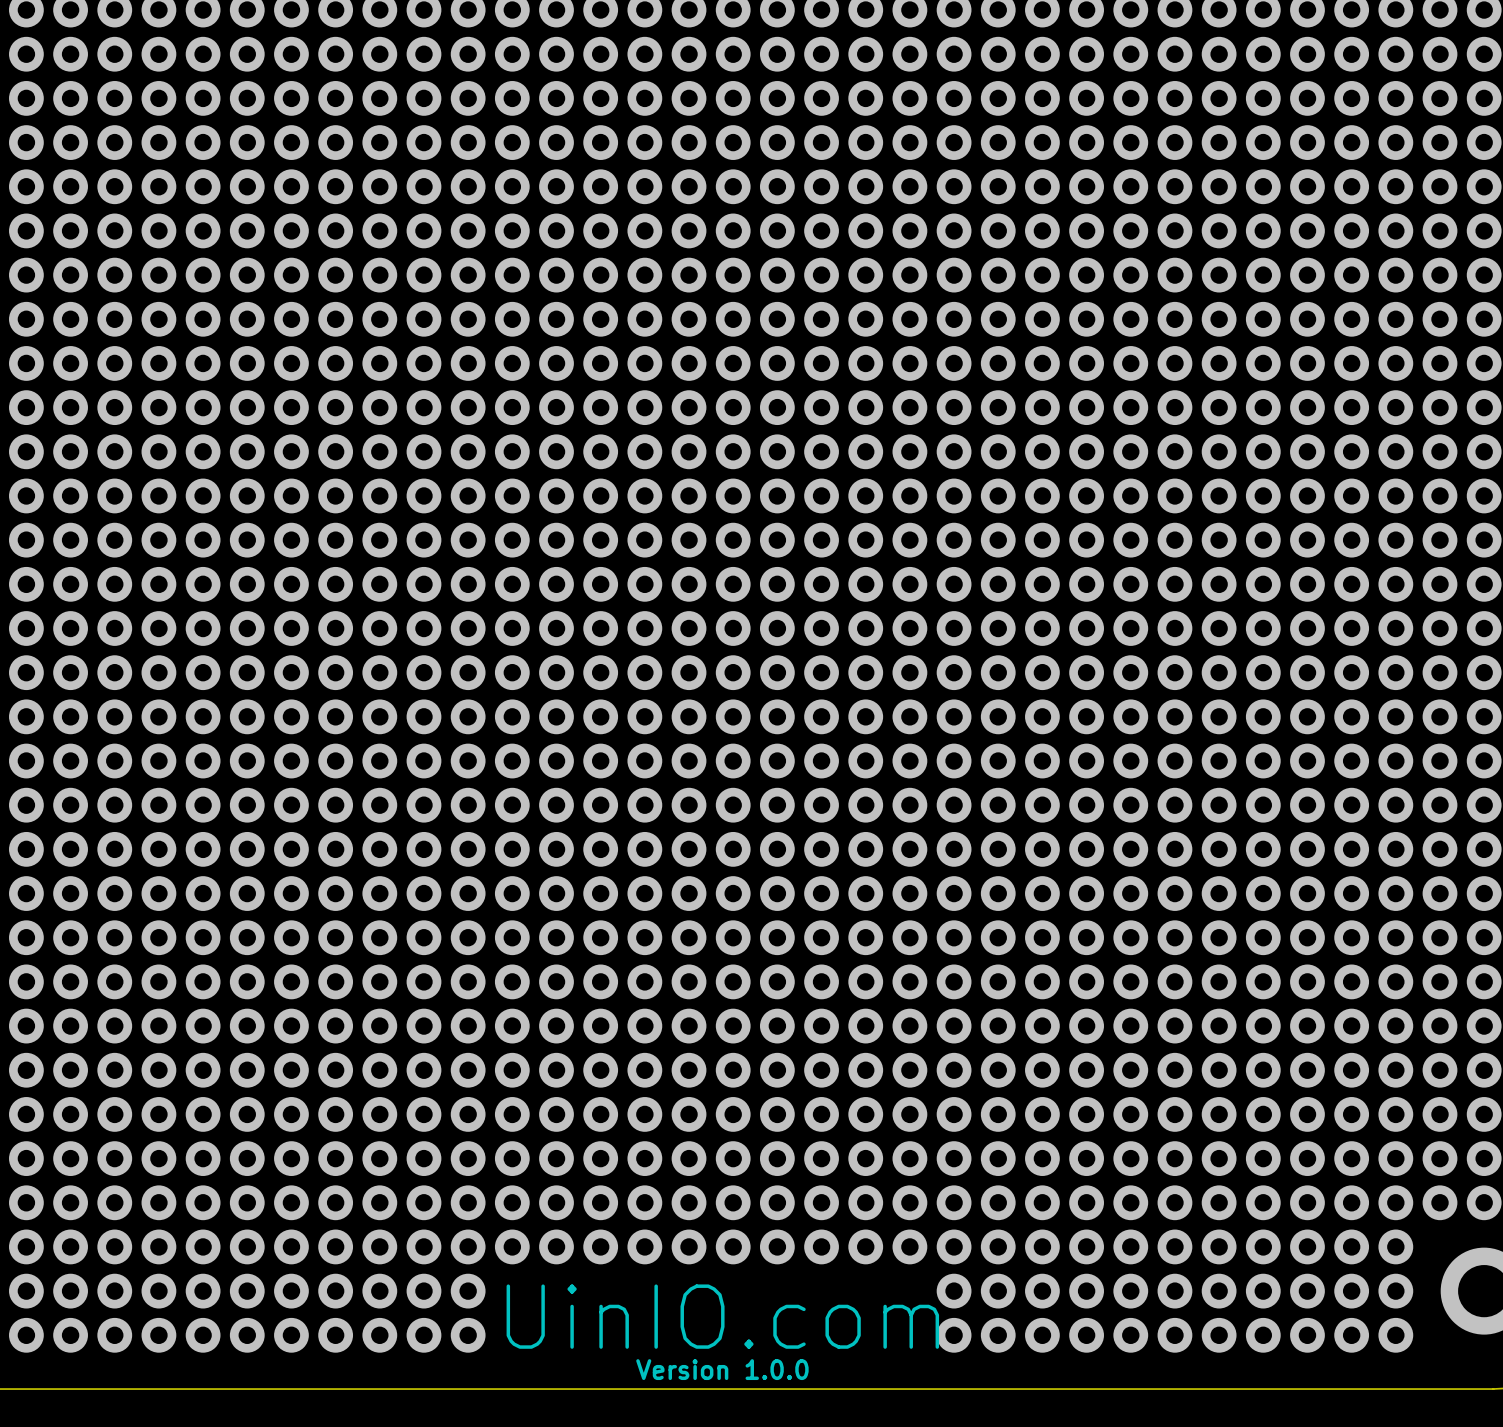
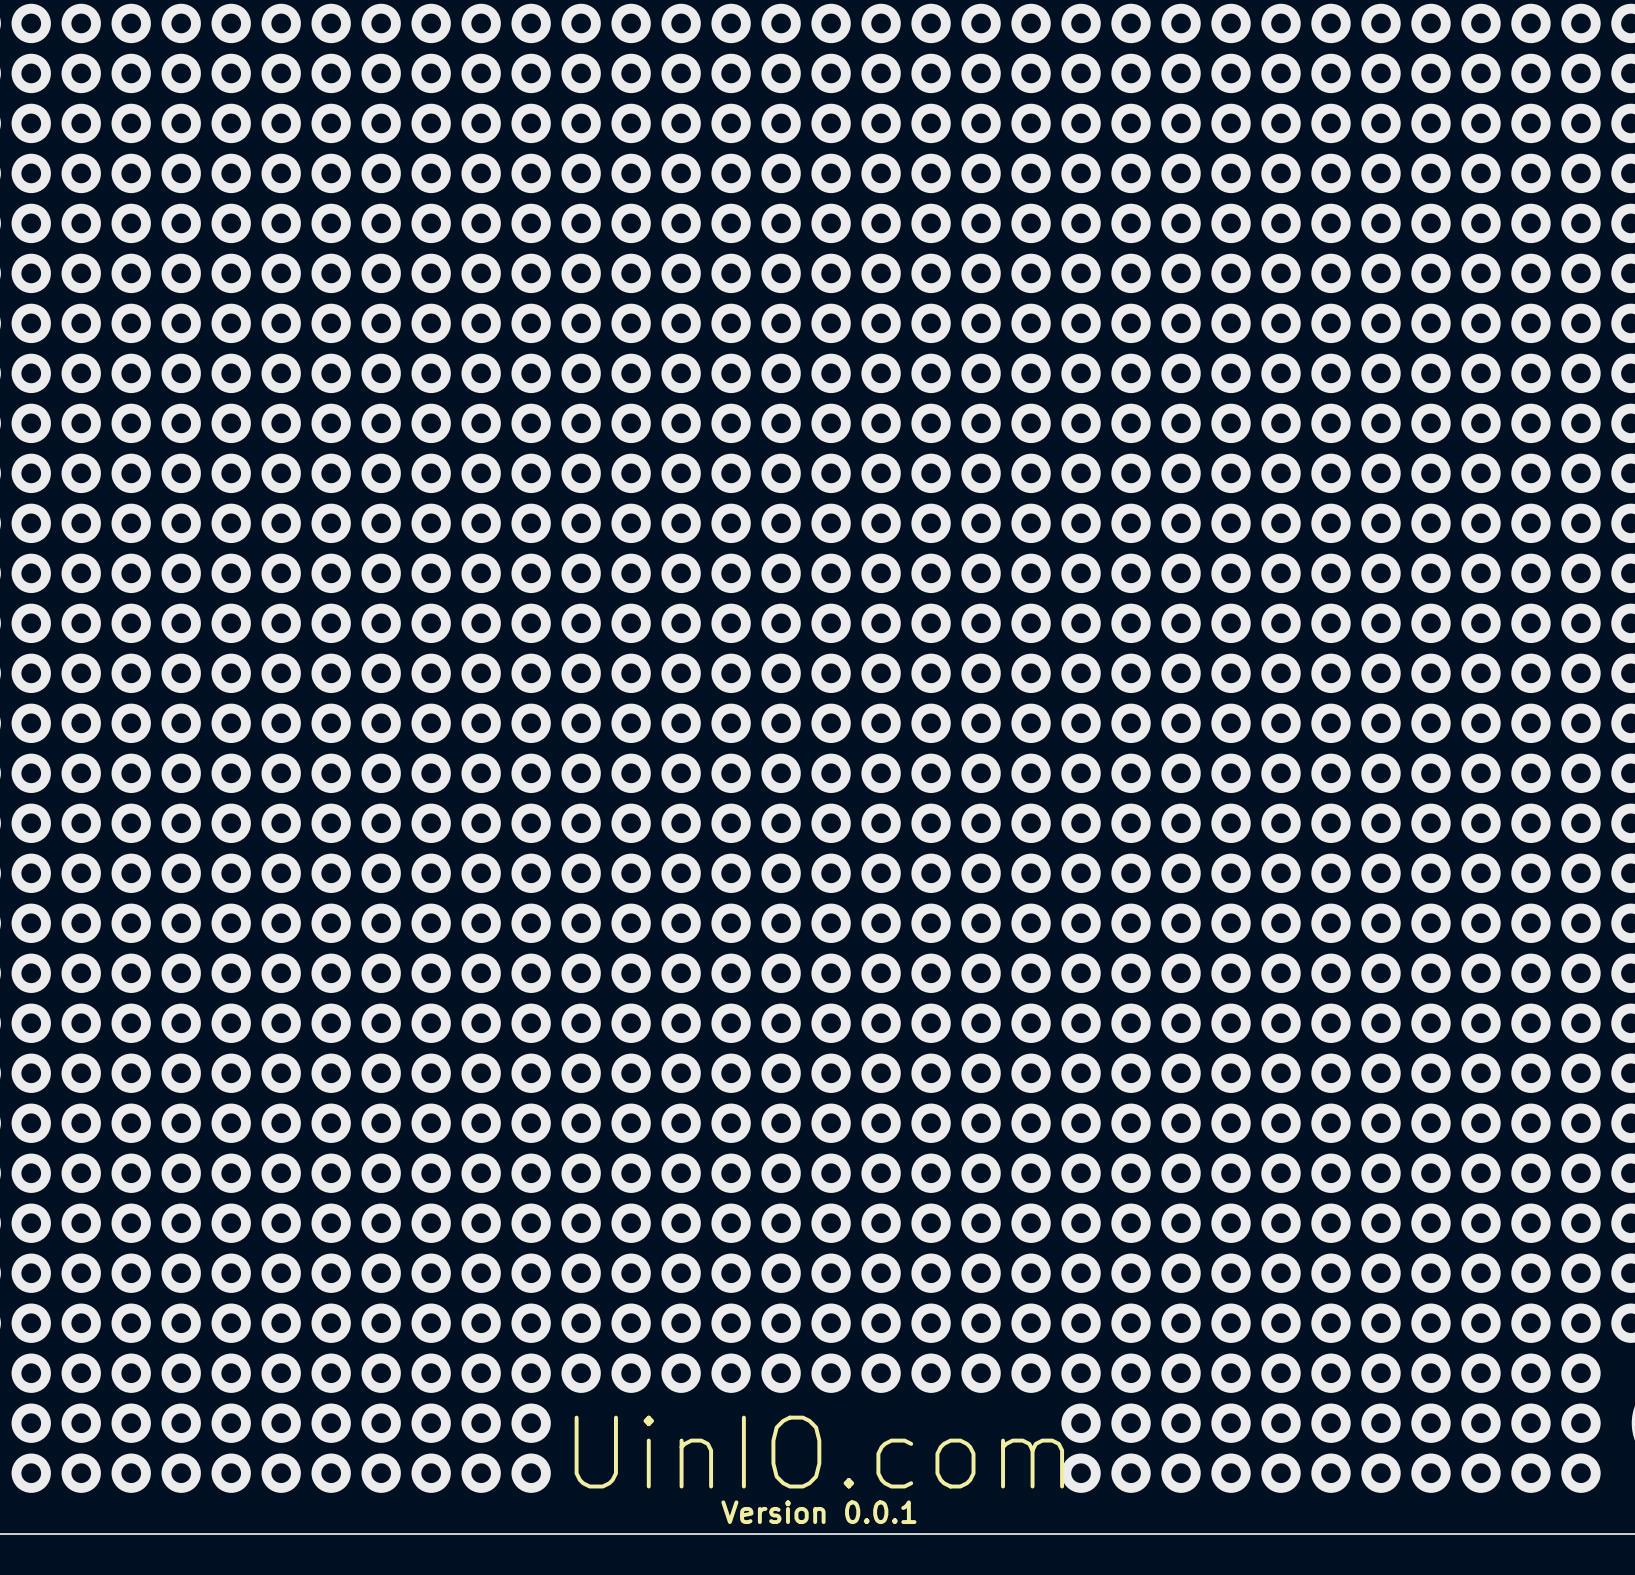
text: Version 1.0.0 (722, 1369) -> Version 0.0.1 (818, 1512)

